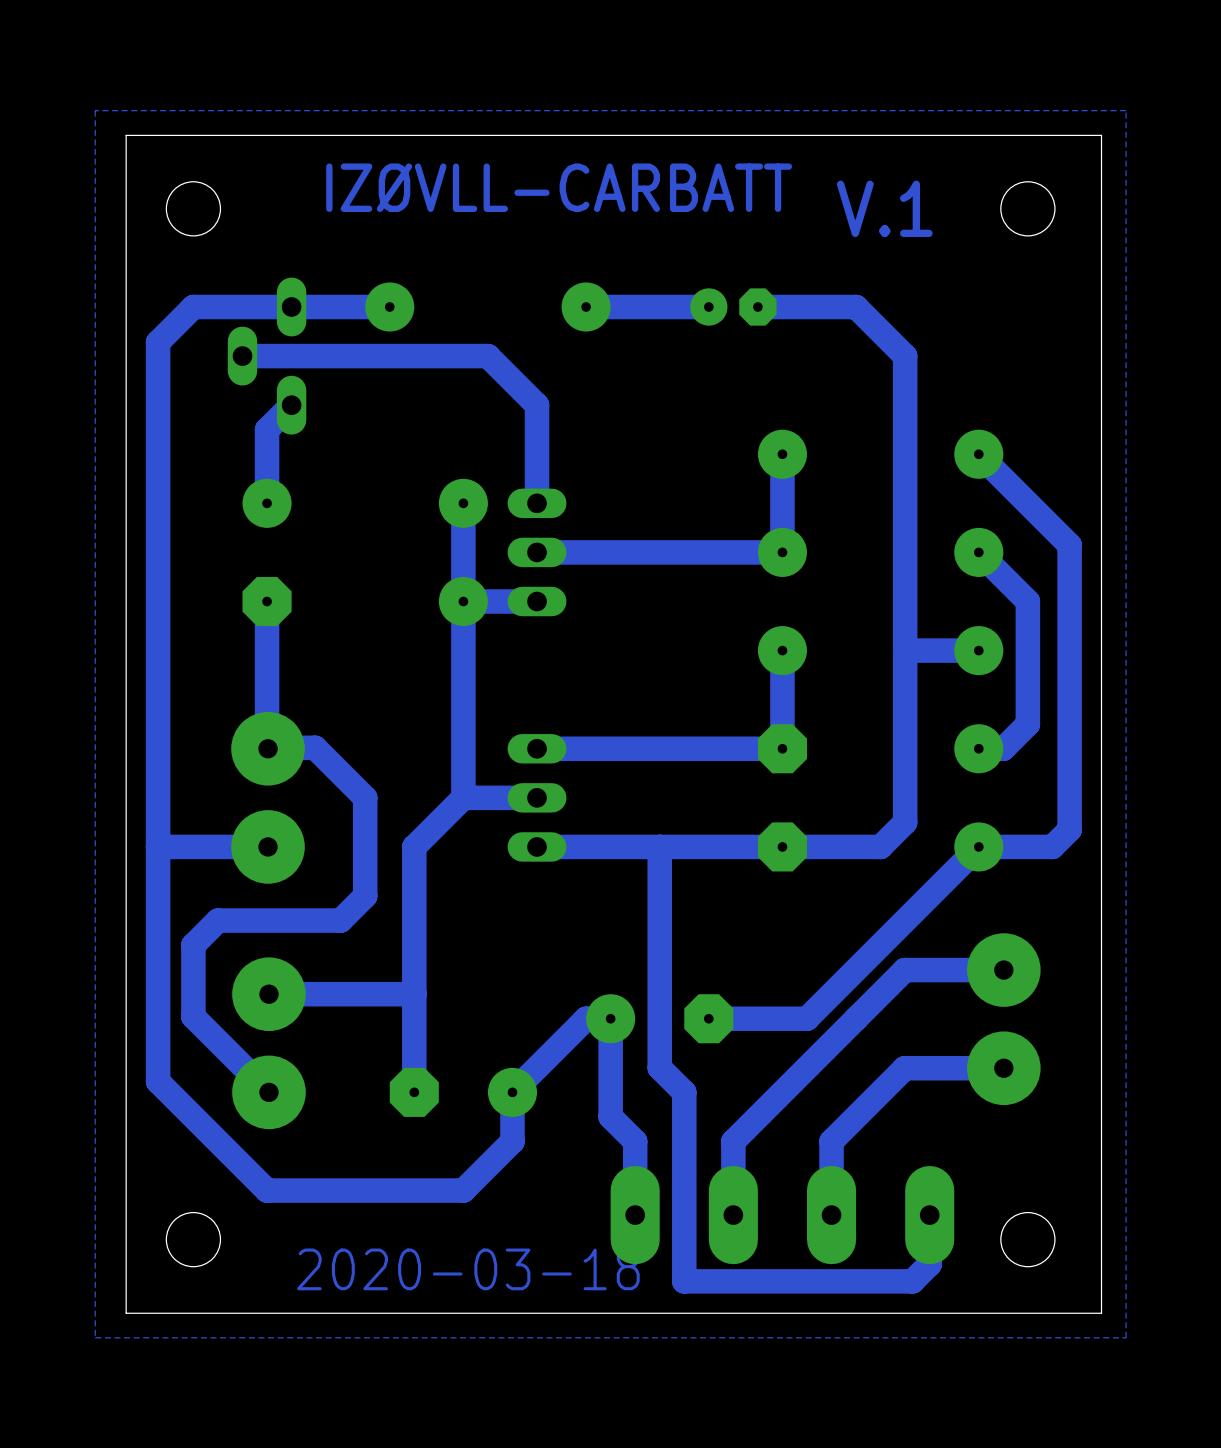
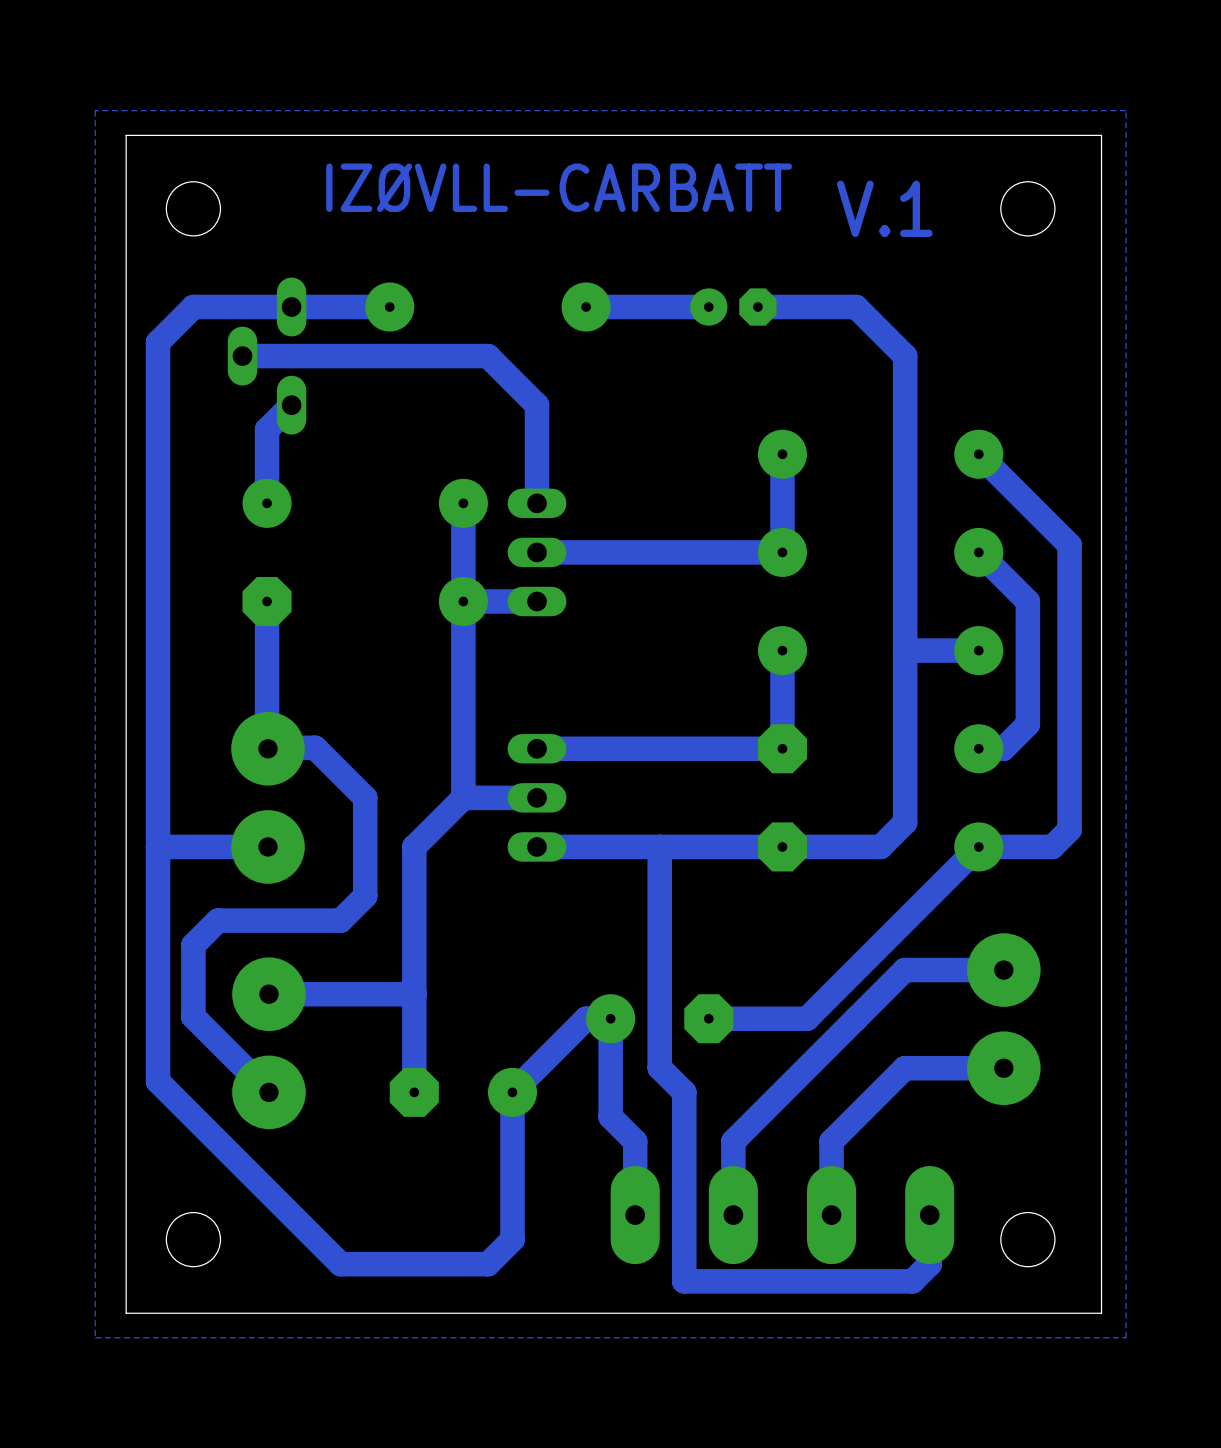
bottom track: (512, 1141) (463, 1190) (267, 1190) -> (512, 1141) (512, 1239) (487, 1264) (340, 1264) (267, 1190)
text: 2020-03-18 (468, 1269) -> none

